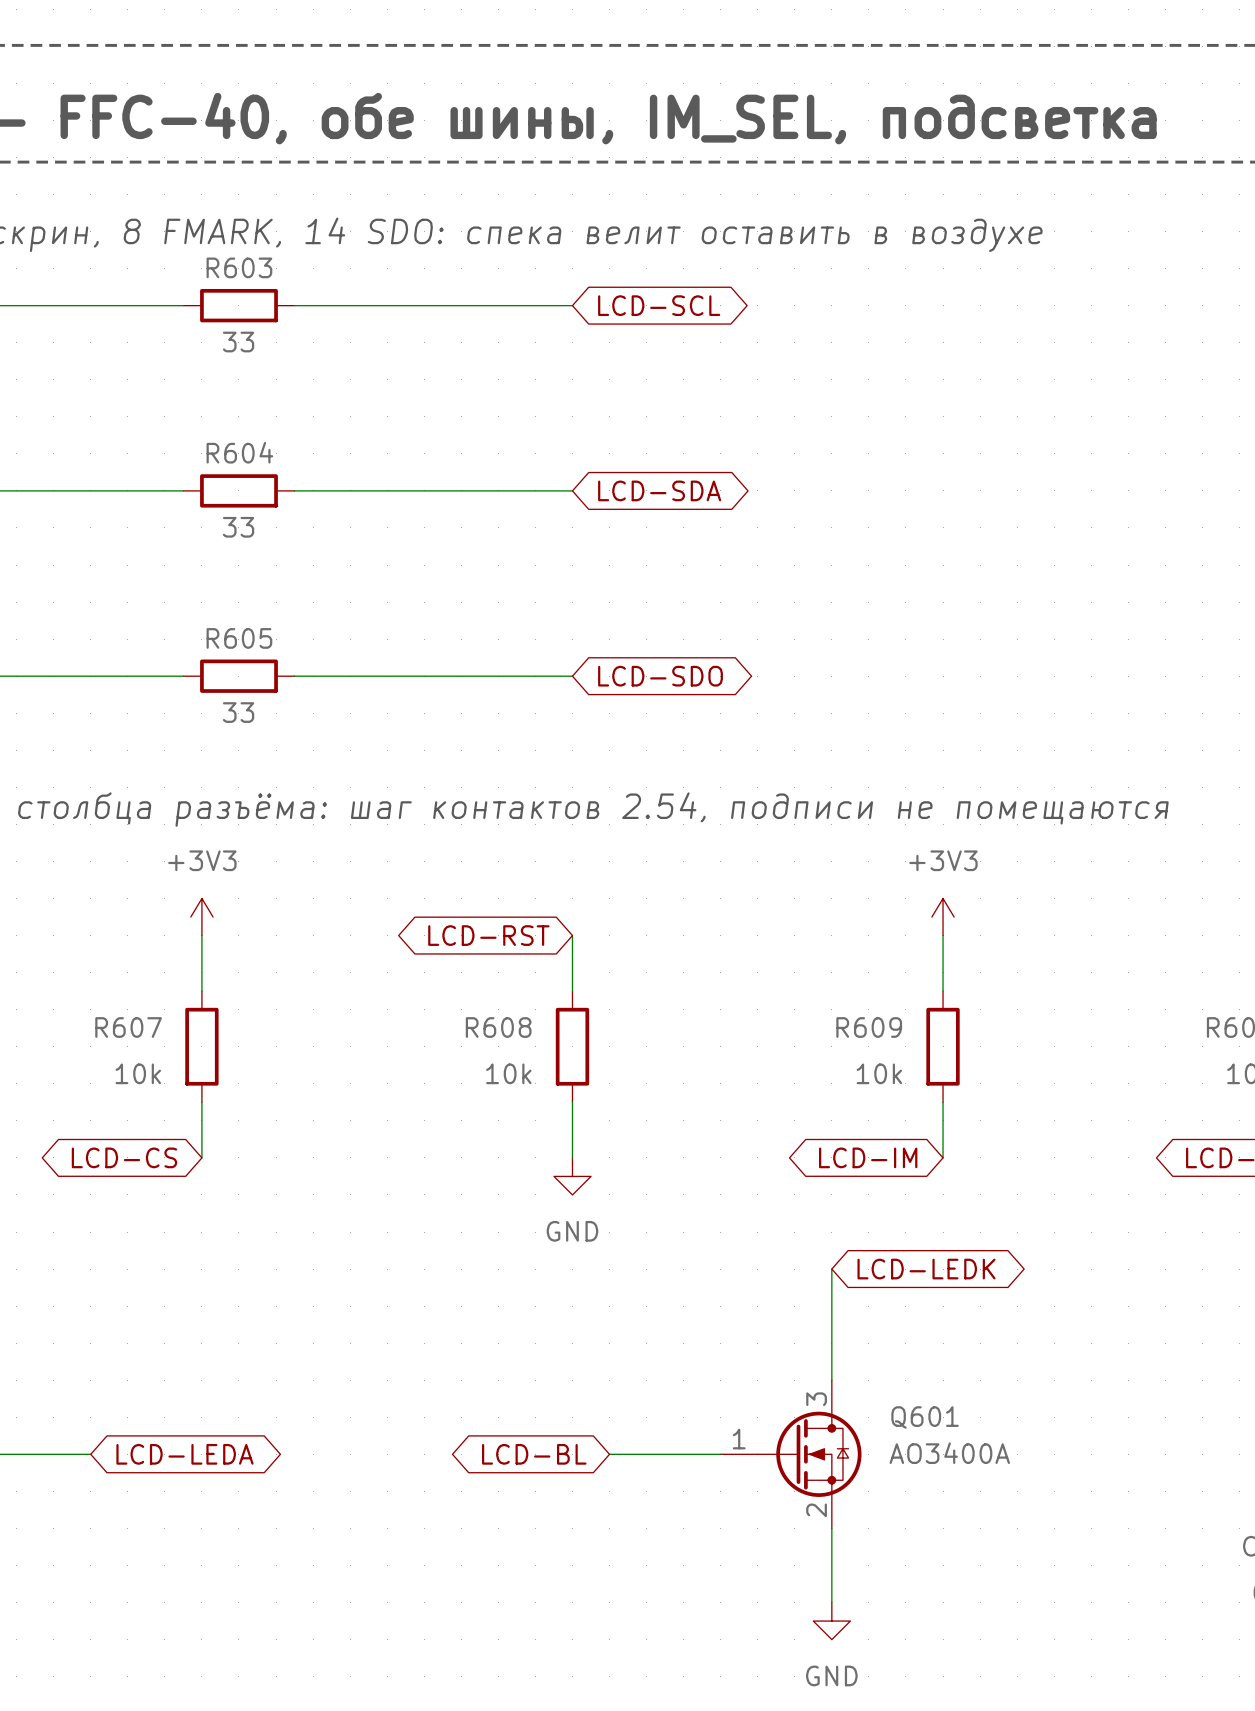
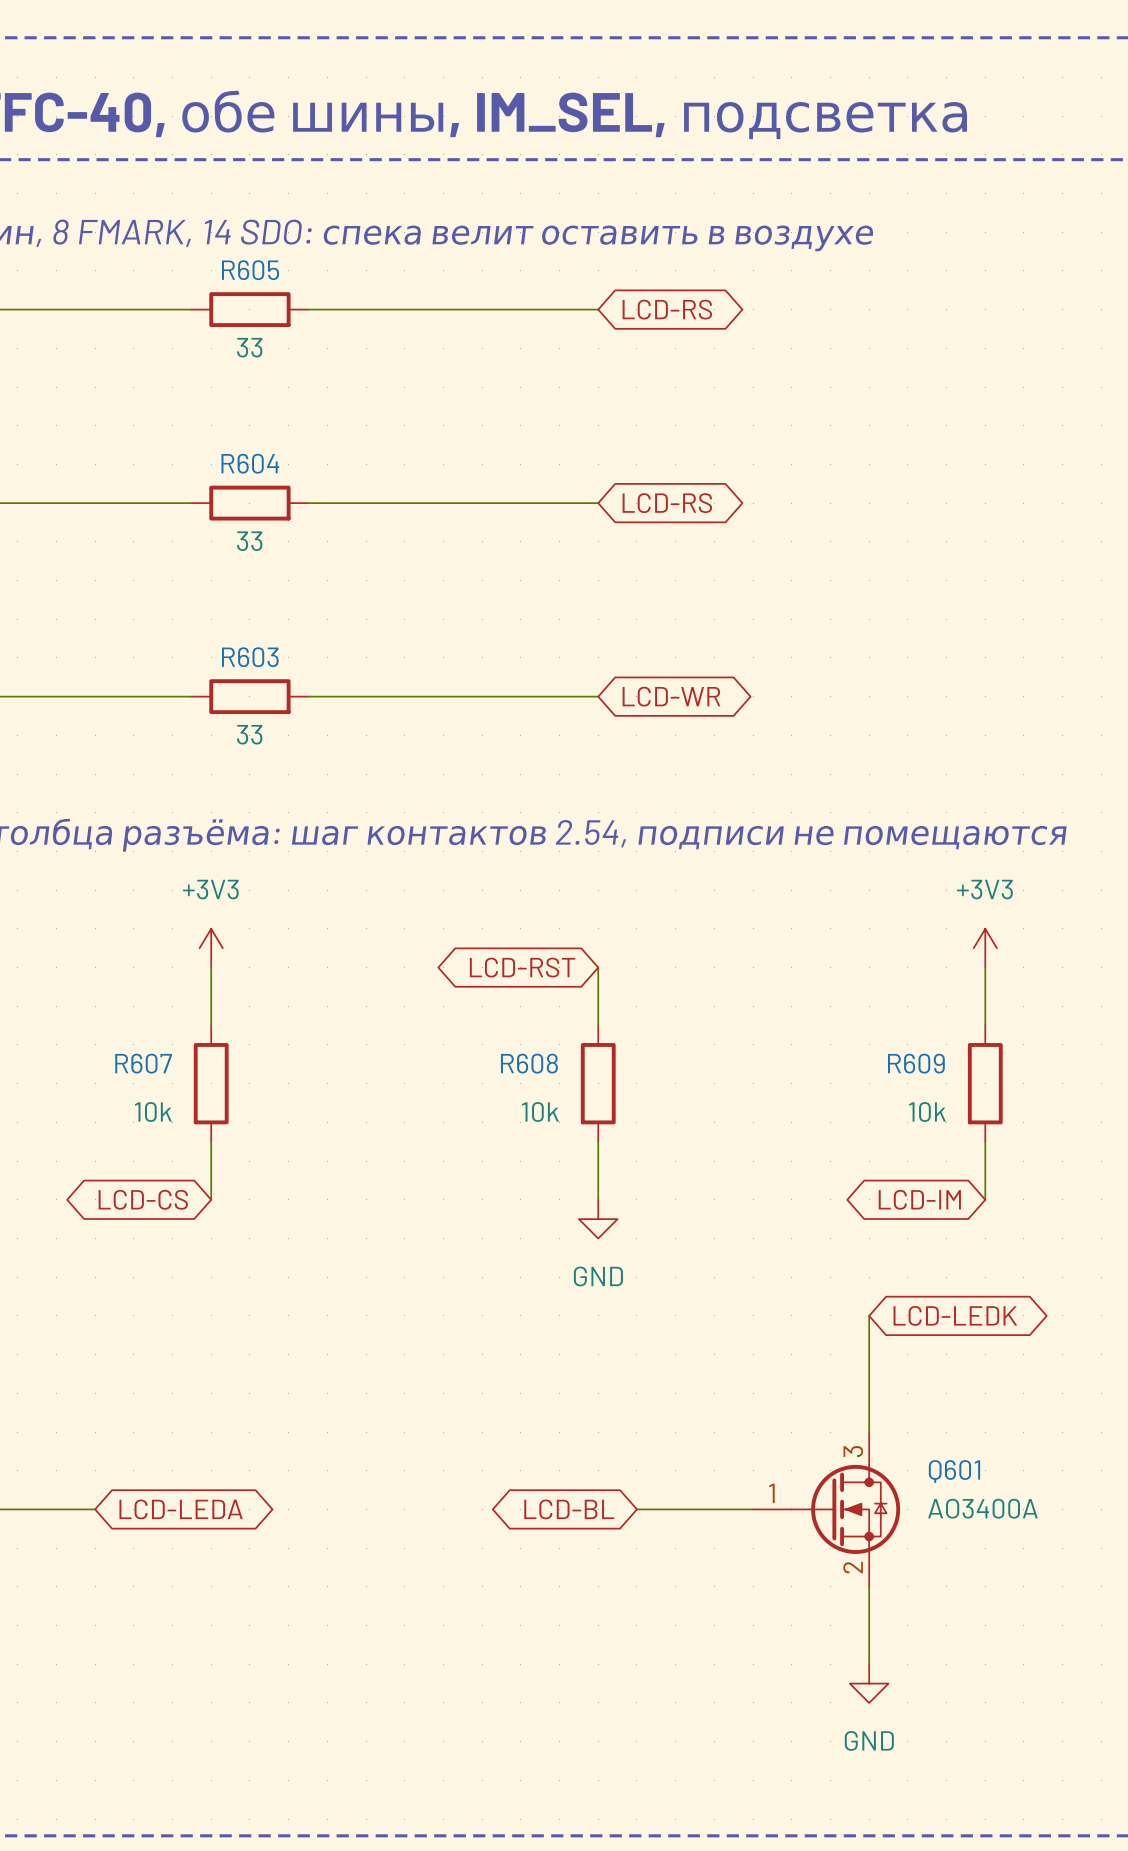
R603 name: R603 (239, 267) -> R605 (250, 270)
global label: LCD-SCL (659, 305) -> LCD-RS (667, 309)
global label: LCD-SDA (659, 490) -> LCD-RS (667, 503)
R605 name: R605 (239, 638) -> R603 (250, 657)
global label: LCD-SDO (660, 676) -> LCD-WR (671, 696)

